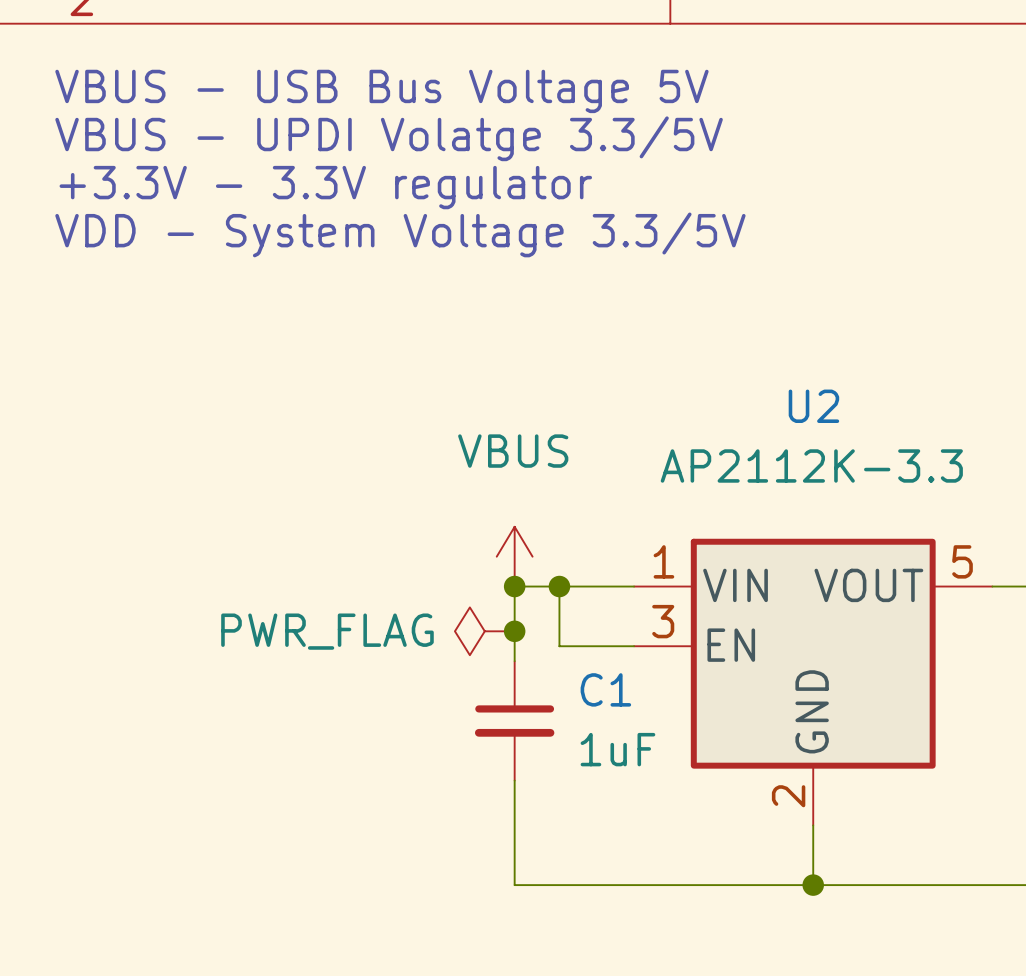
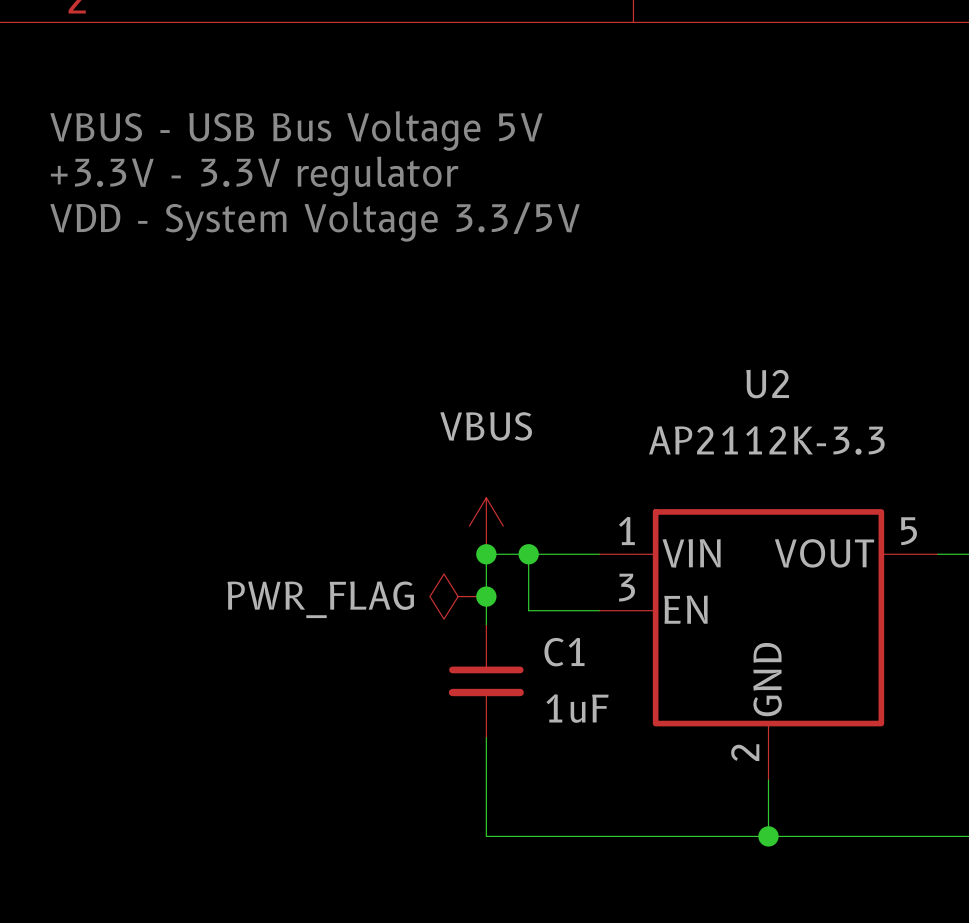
text: VBUS - USB Bus Voltage 5V (381, 91) -> none
text: VBUS - UPDI Volatge 3.3/5V (389, 138) -> VBUS - USB Bus Voltage 5V (296, 130)

